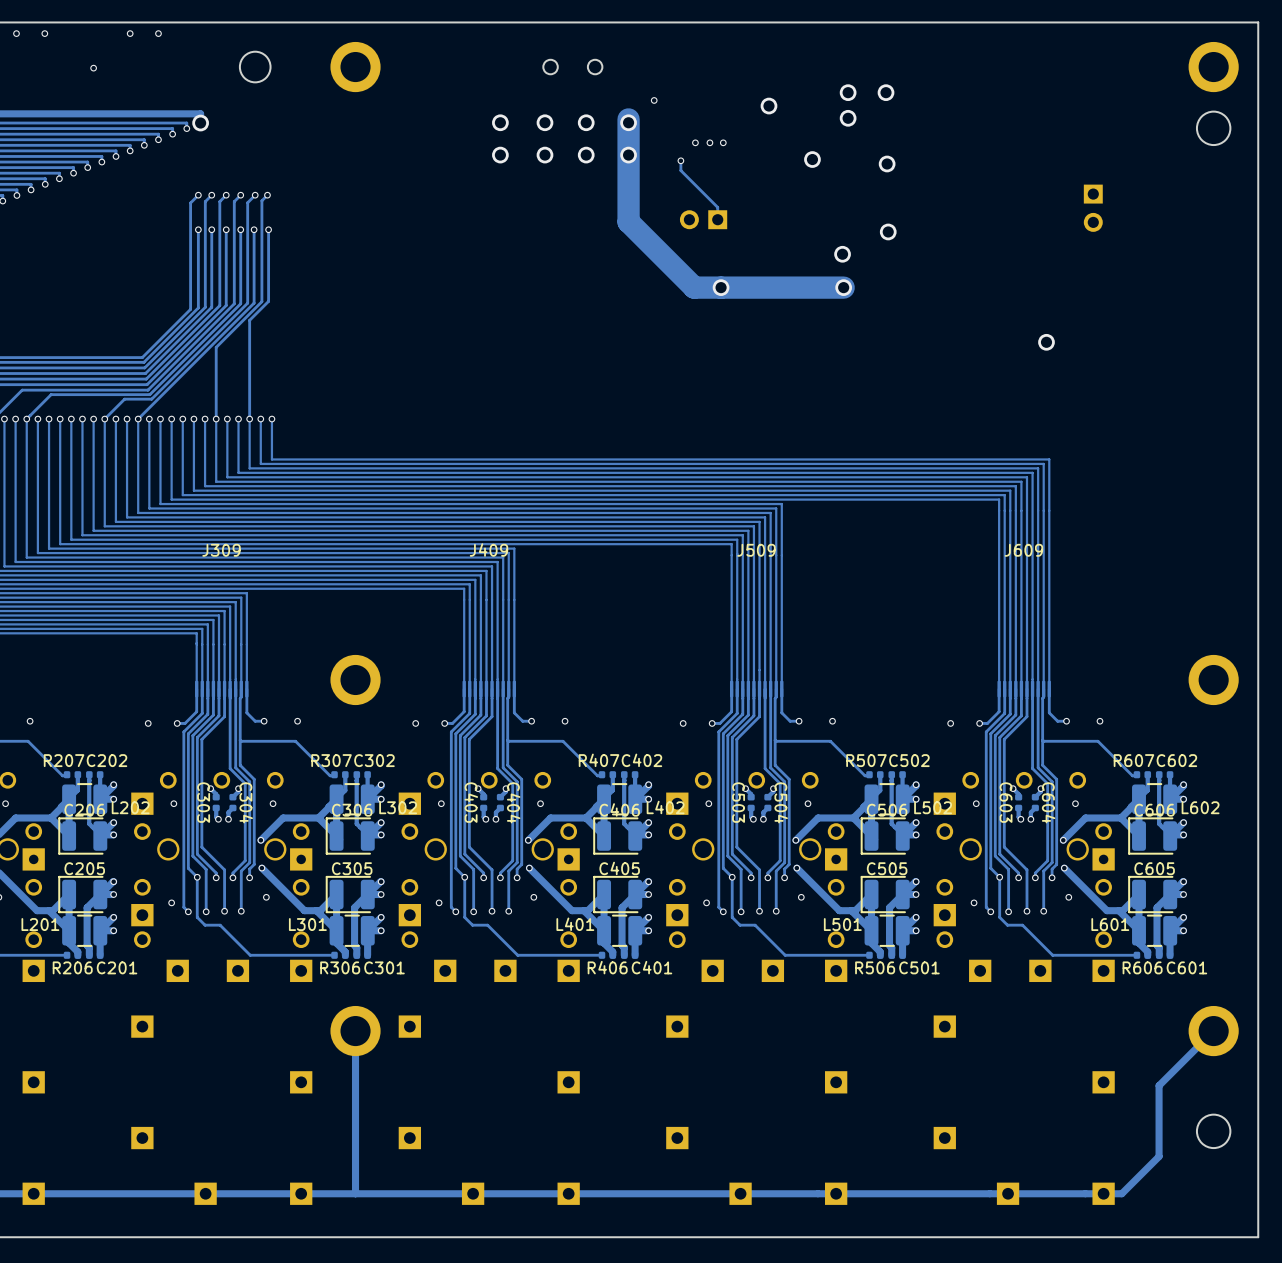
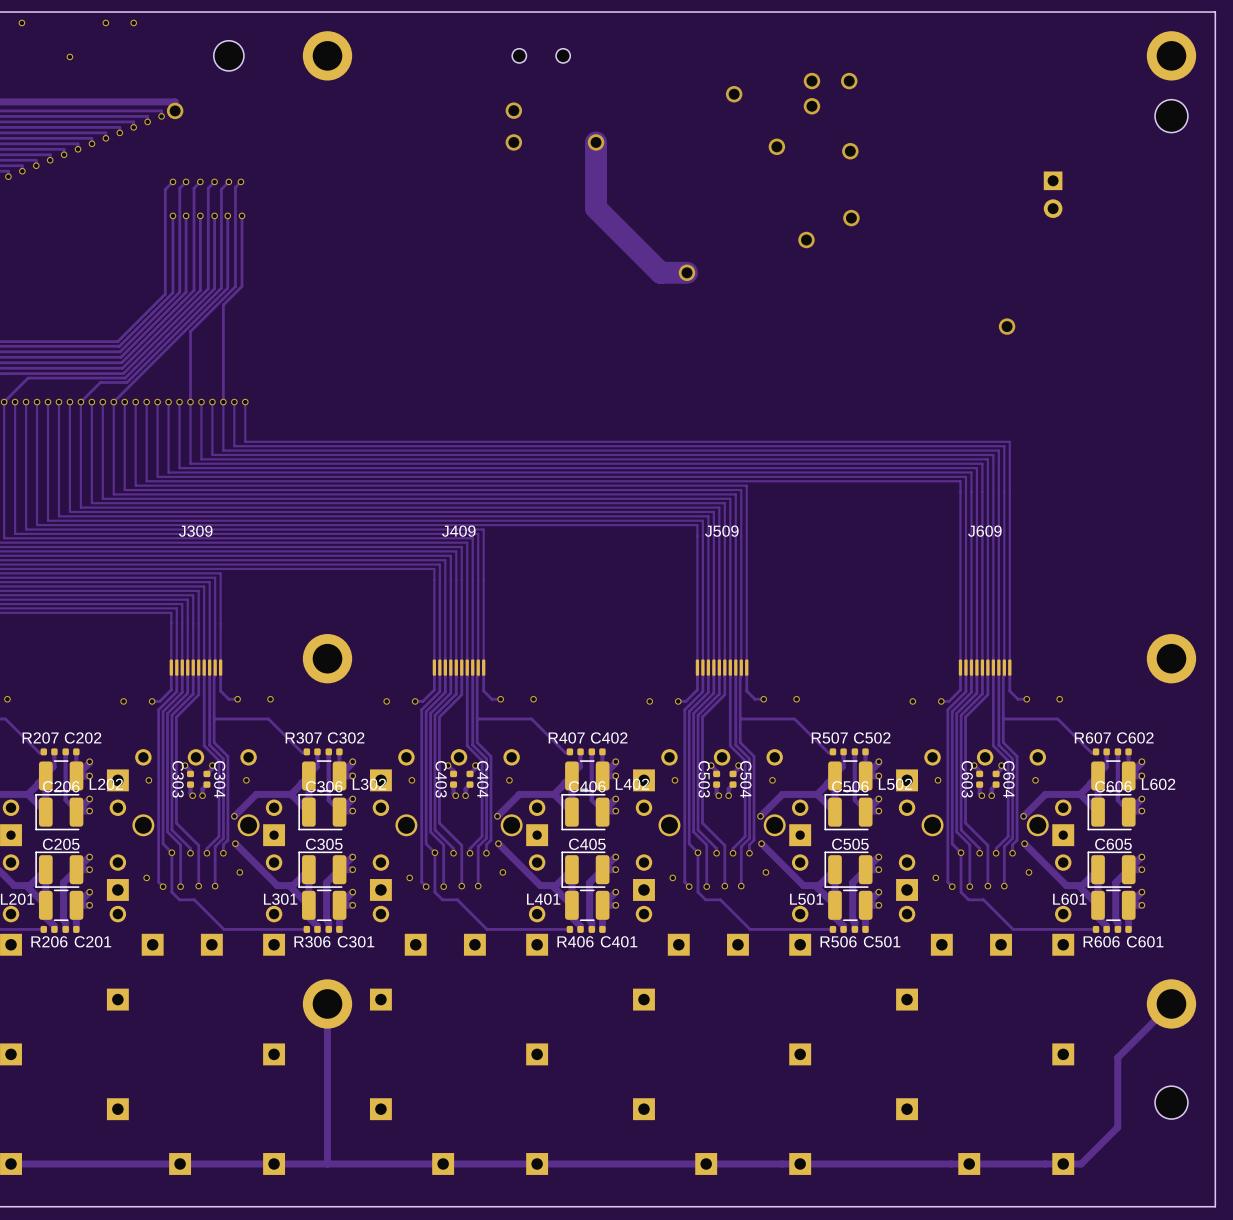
via: (654, 100) -> none
track: (628, 119) (628, 155) -> none
via: (500, 122) -> none
via: (586, 122) -> none
via: (628, 122) -> none
via: (695, 142) -> none
via: (709, 142) -> none
via: (723, 142) -> none
via: (500, 155) -> none
via: (586, 155) -> none
track: (680, 160) (680, 170) (717, 207) (717, 219) -> none
via: (680, 160) -> none
part: (703, 219) -> none
track: (843, 287) (721, 287) -> none
via: (843, 287) -> none

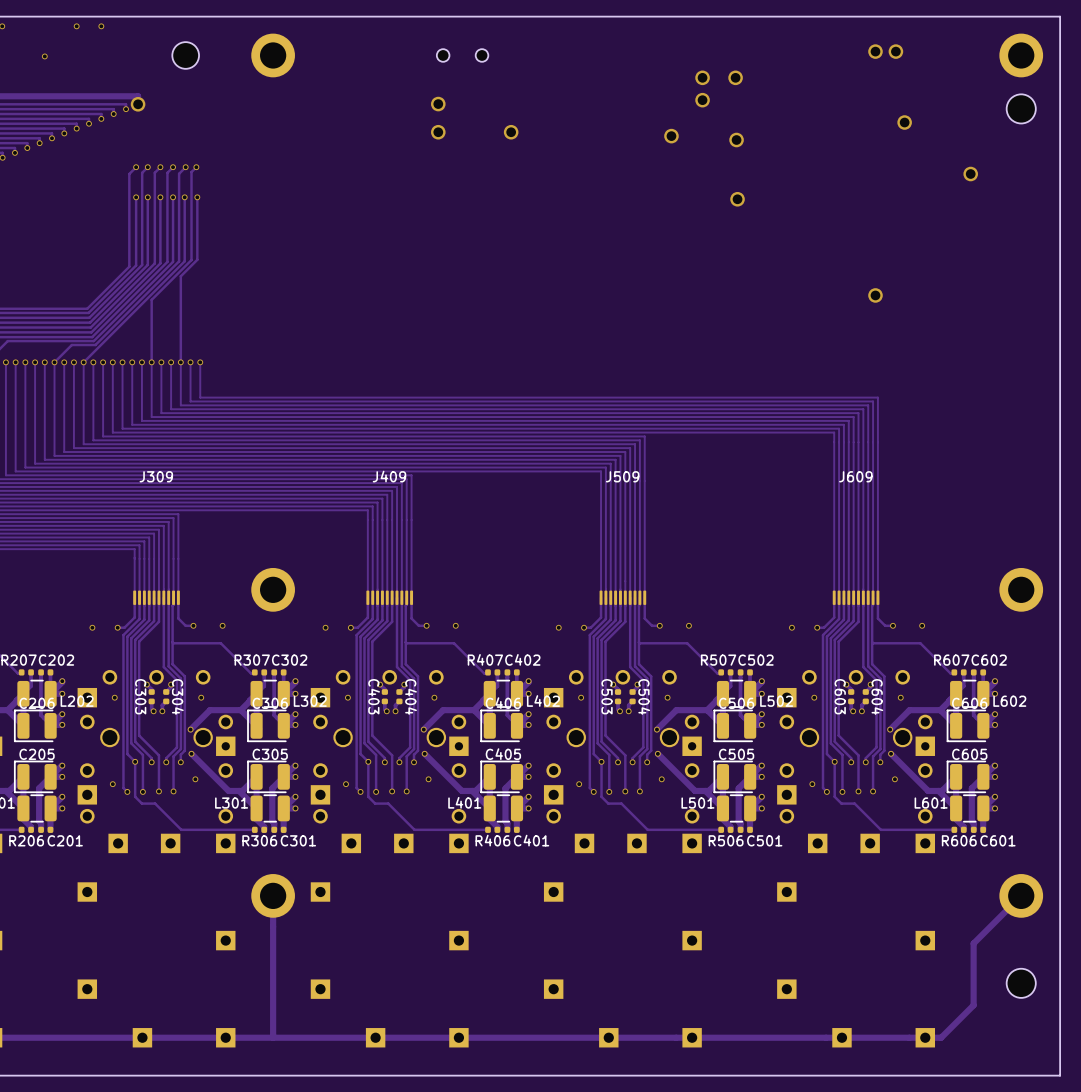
via: none -> (875, 51)
via: none -> (895, 51)
via: (734, 94) -> none
via: none -> (904, 122)
track: (596, 142) (596, 208) (660, 272) (687, 272) -> none
via: none -> (970, 174)
part: (1053, 194) -> none
via: (806, 240) -> none
via: (687, 272) -> none

